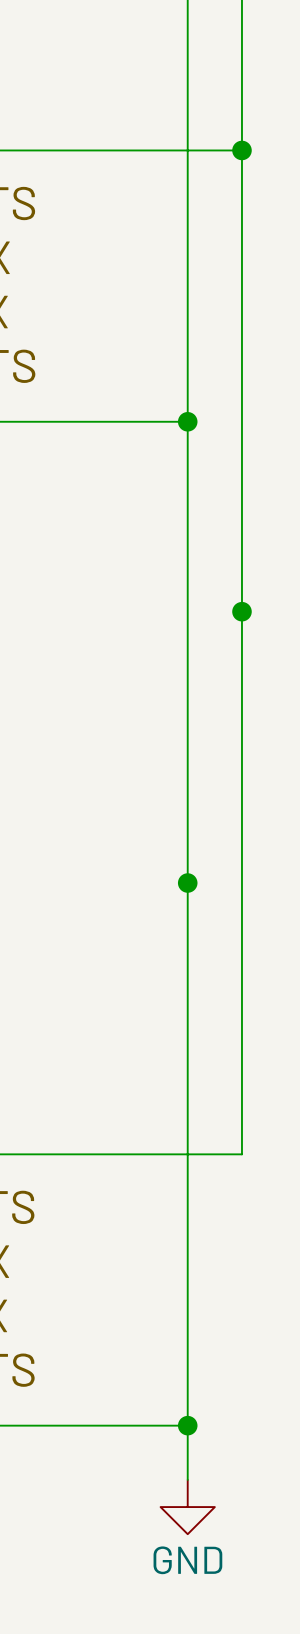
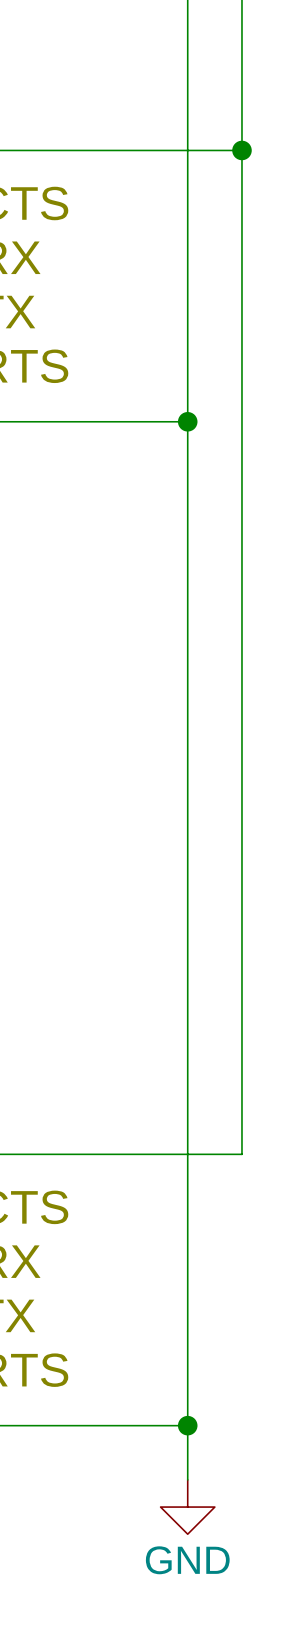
junction: (241, 611) -> none
junction: (187, 883) -> none

